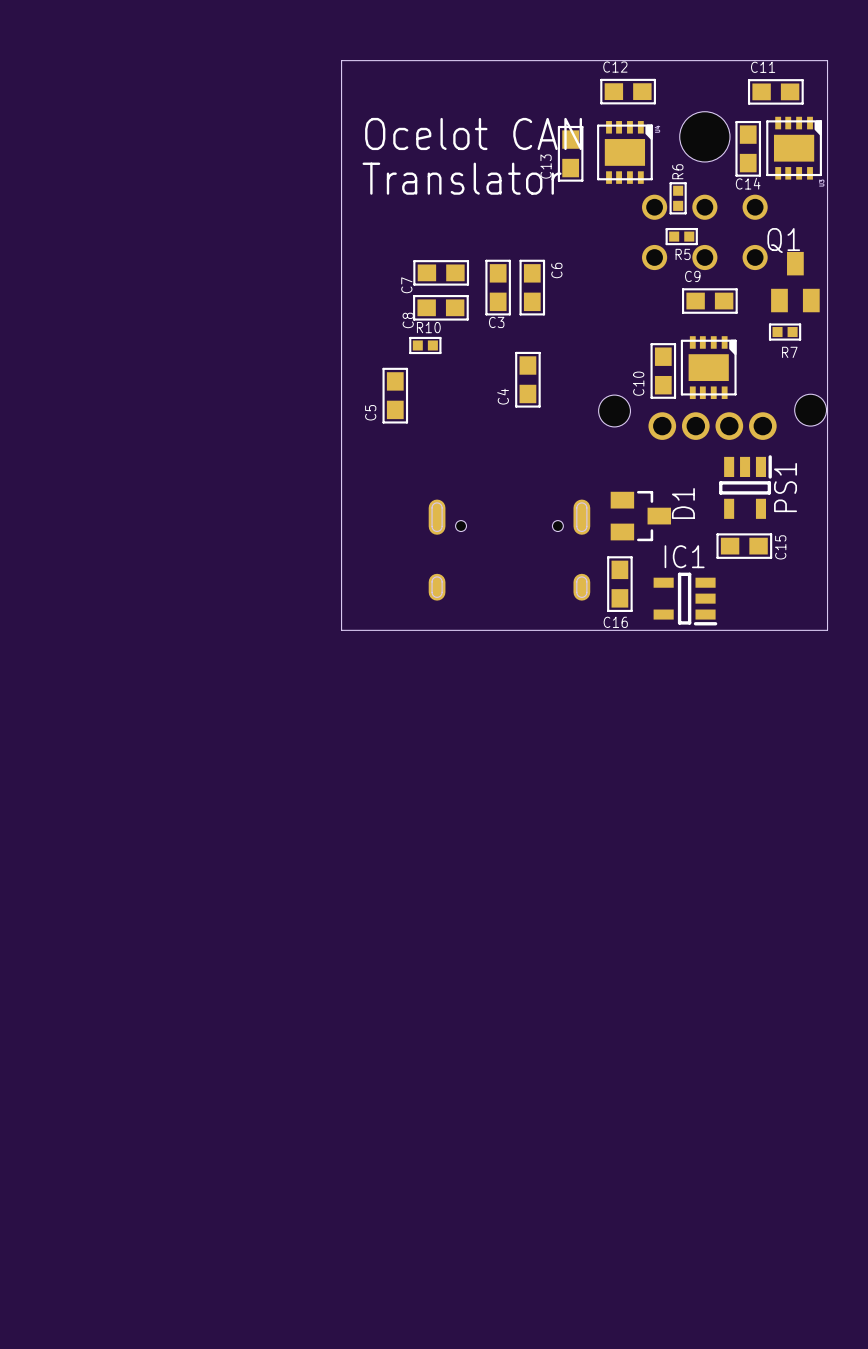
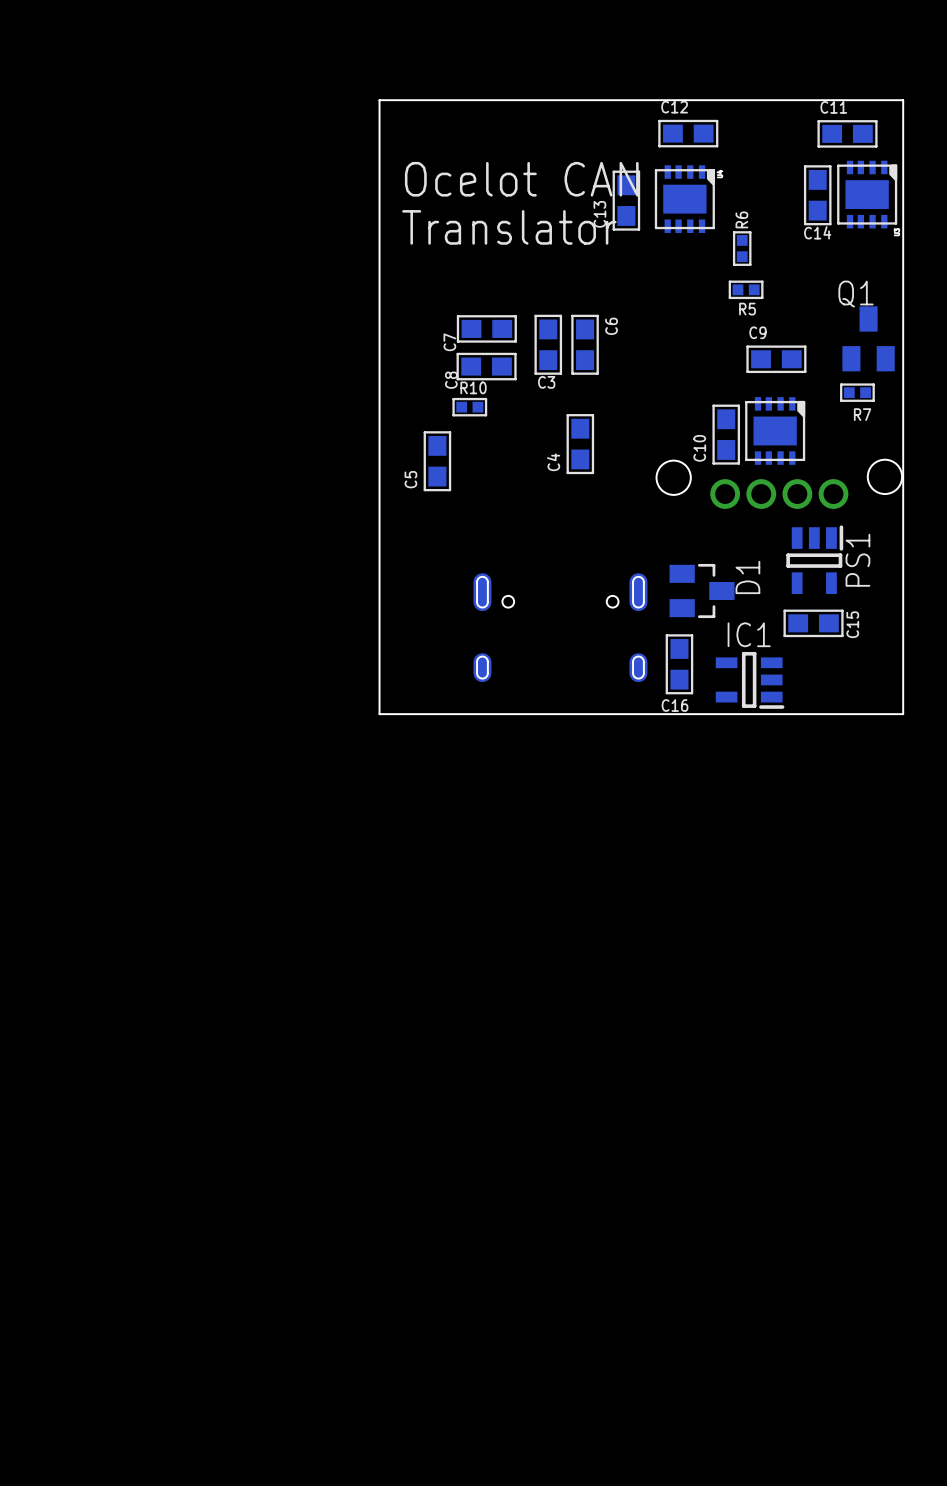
part: (704, 190) -> none

